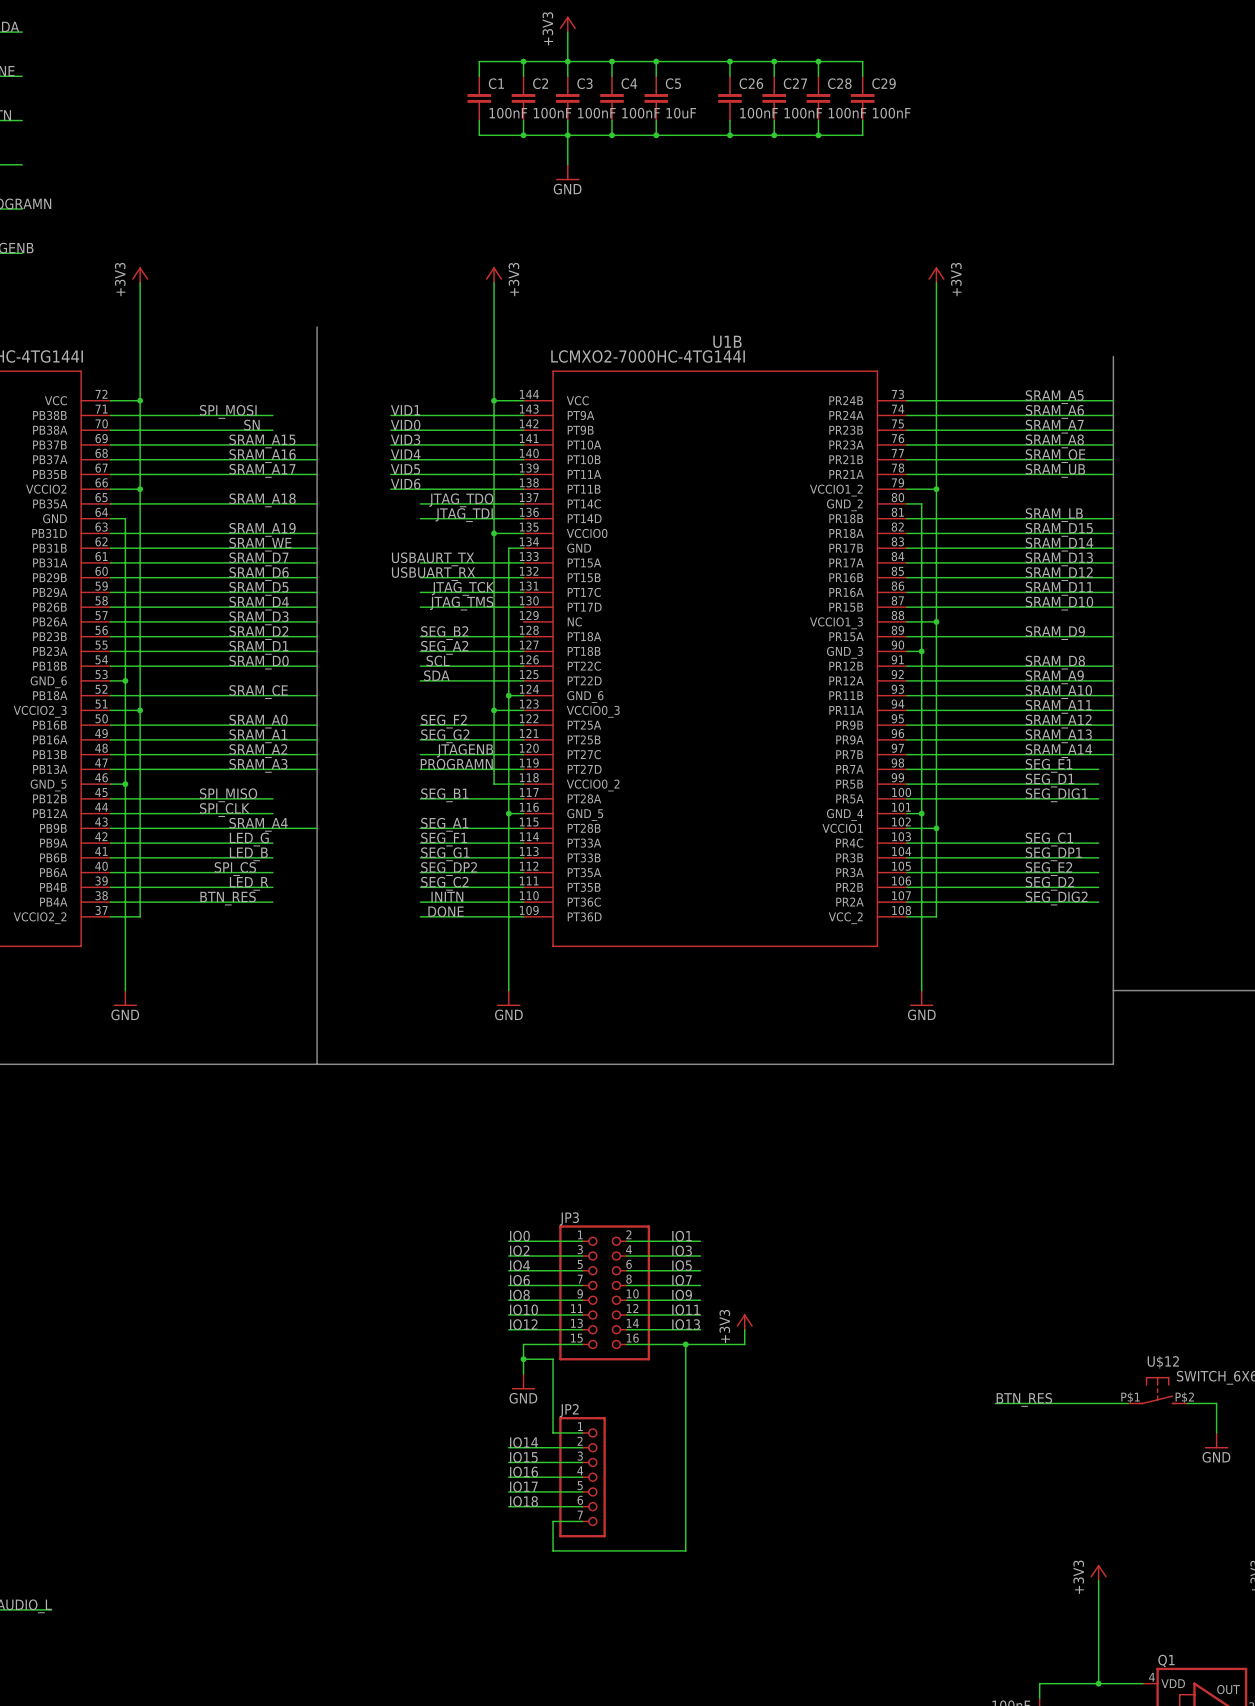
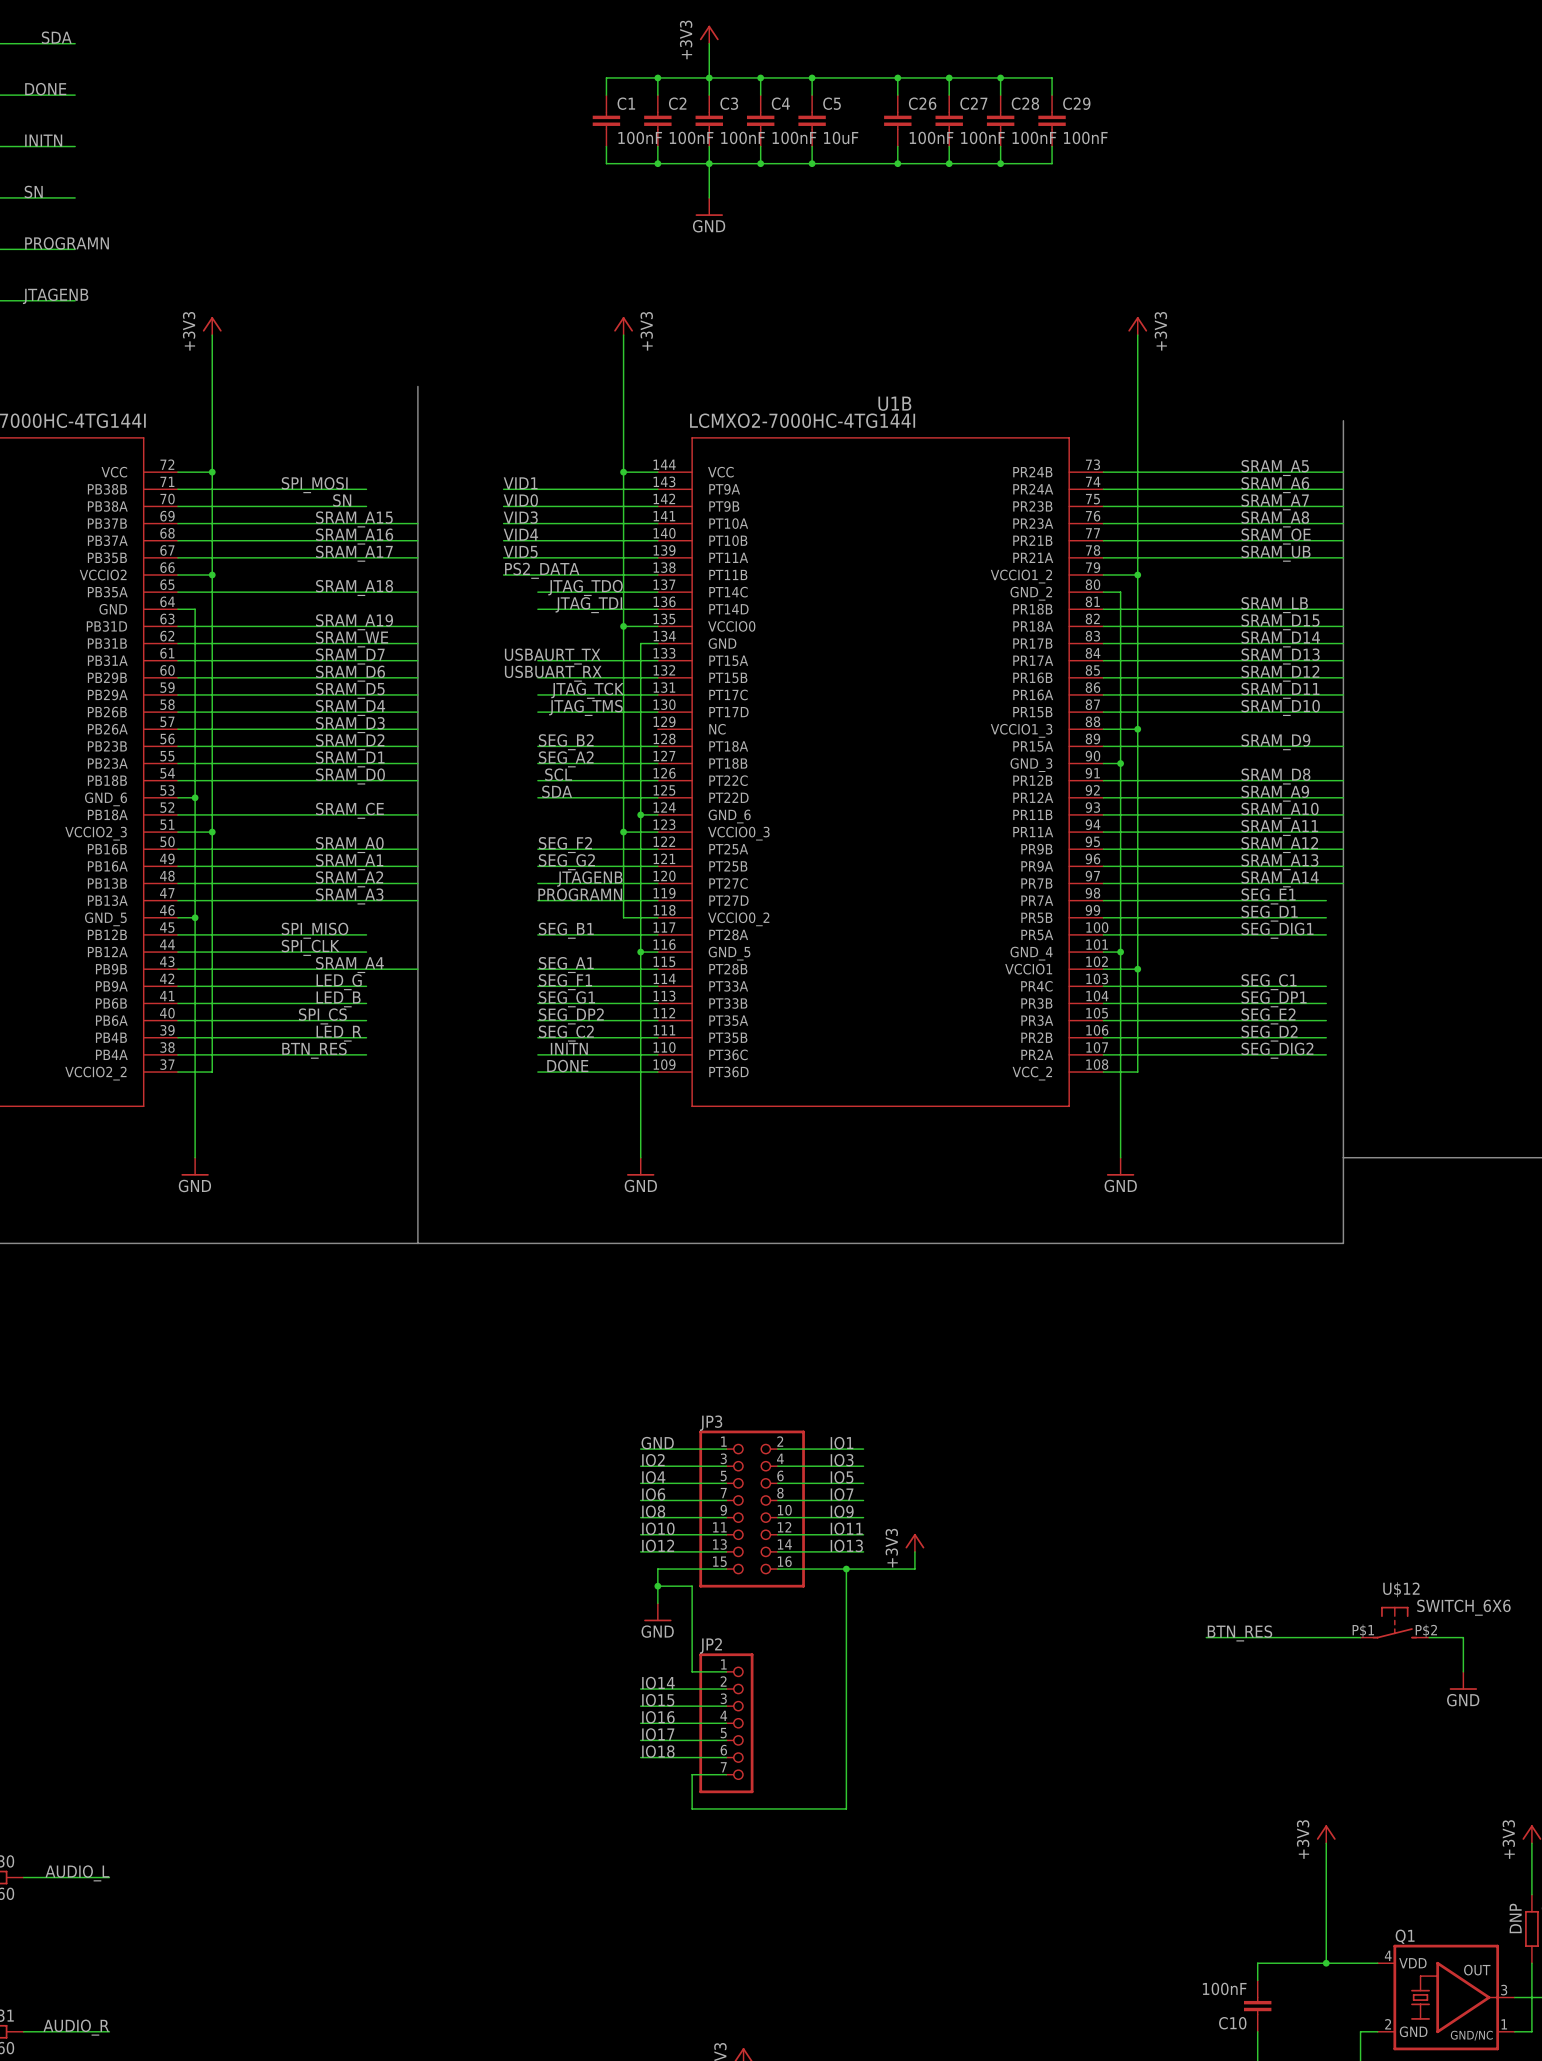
label: VID6 (405, 484) -> PS2_DATA (542, 570)
label: IO0 (519, 1236) -> GND (657, 1443)

